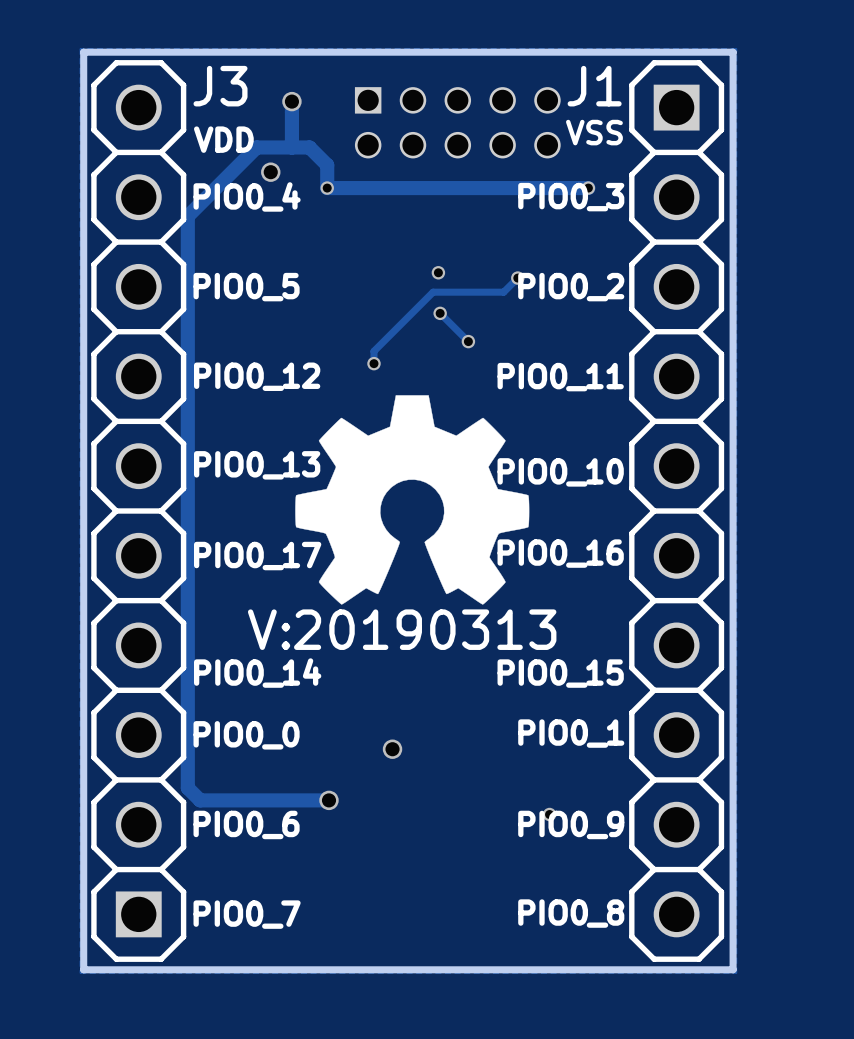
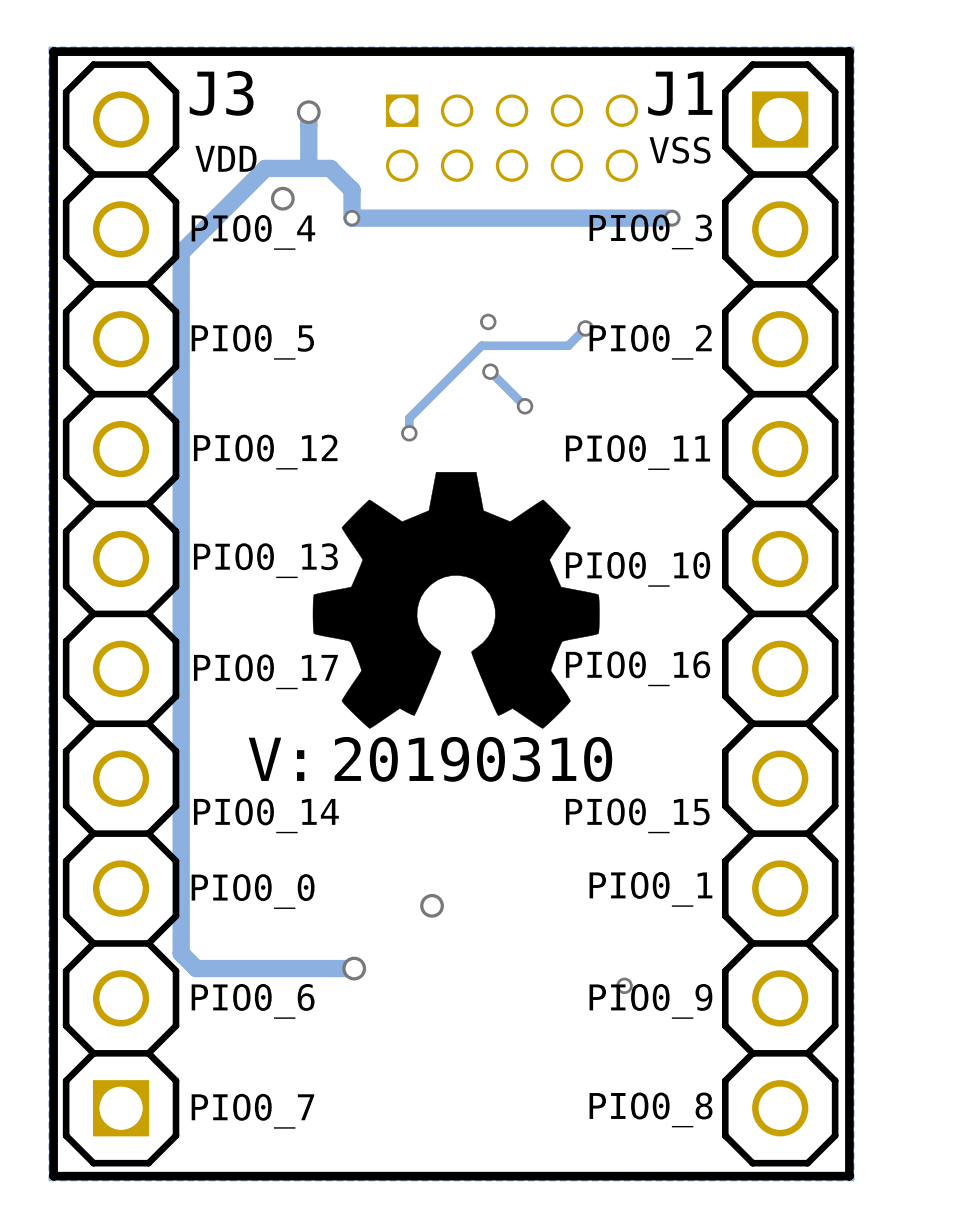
drawing shape: [247, 609, 557, 650] -> [248, 736, 613, 782]

